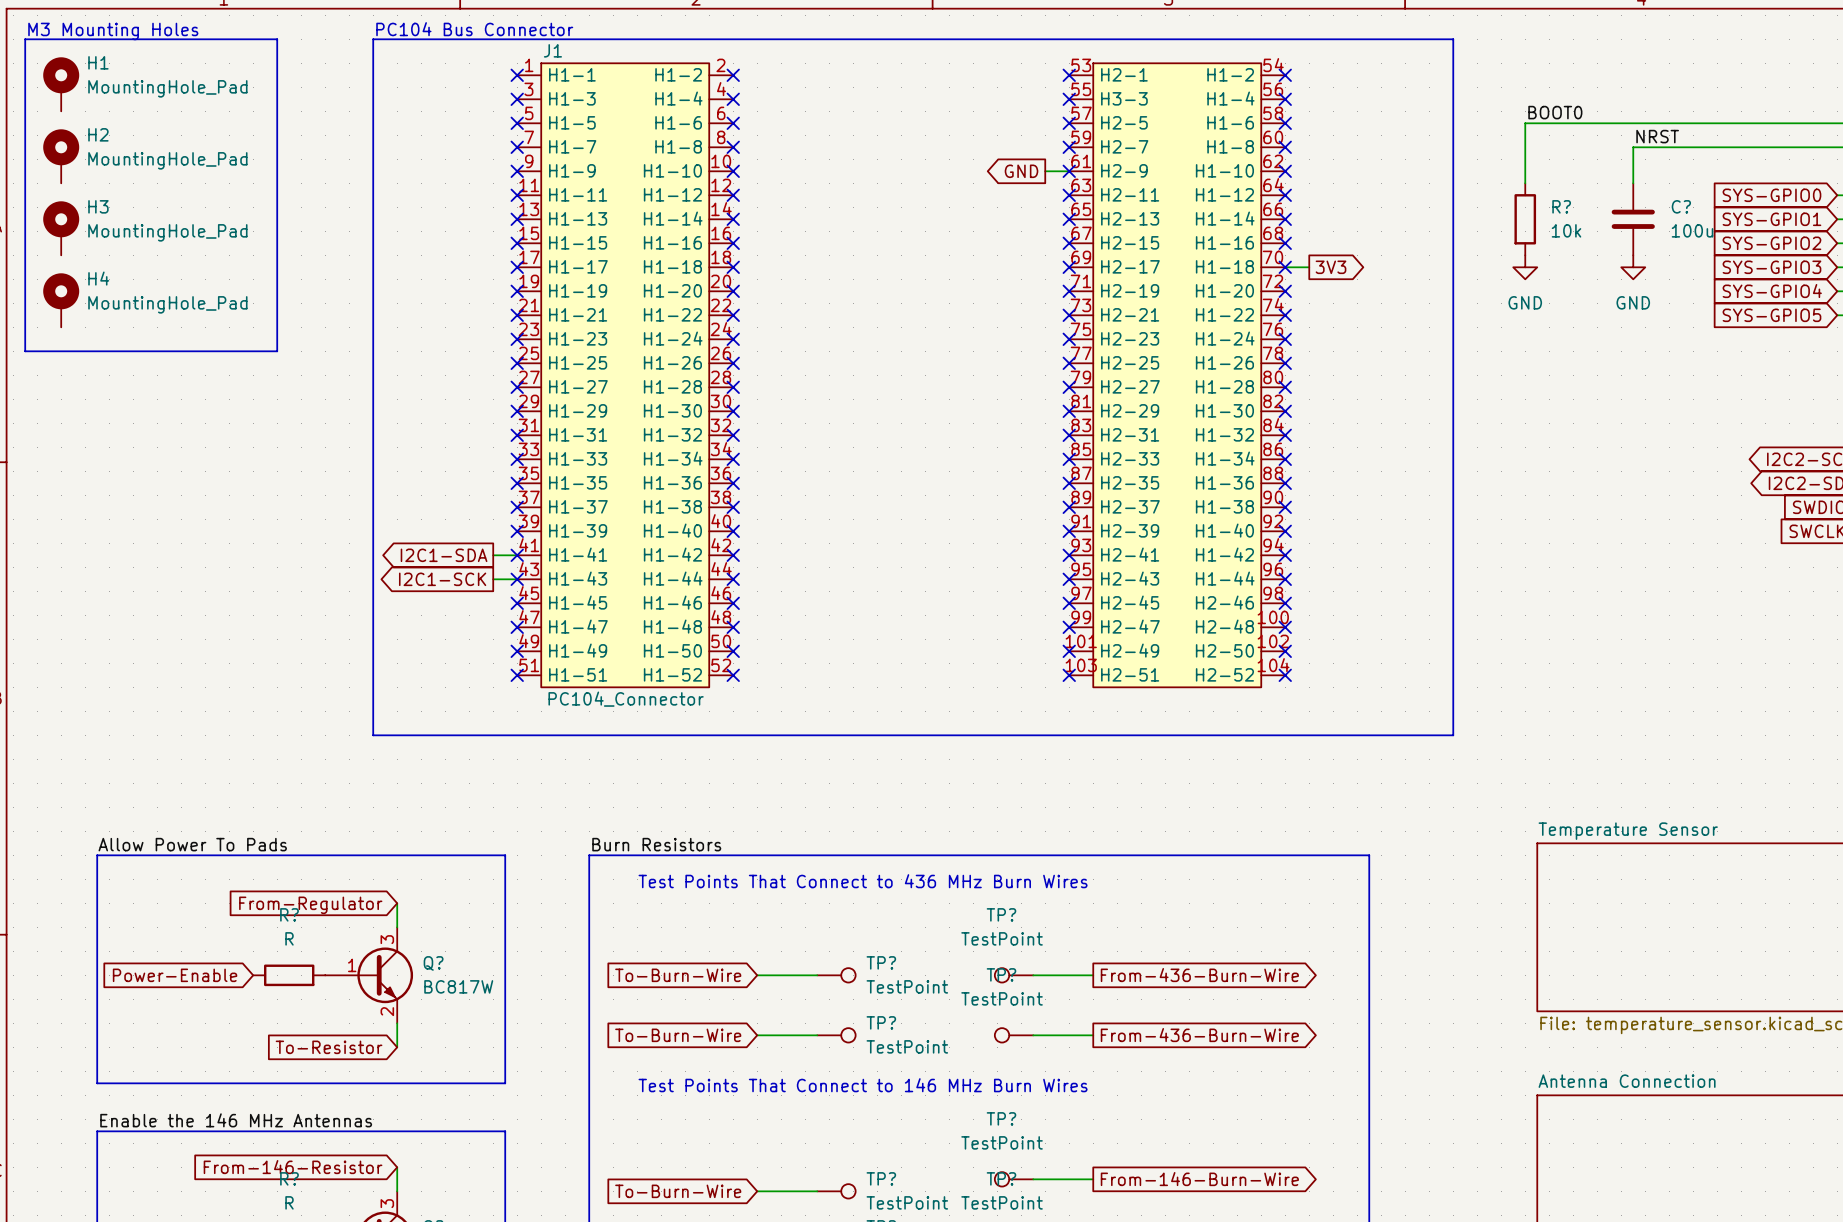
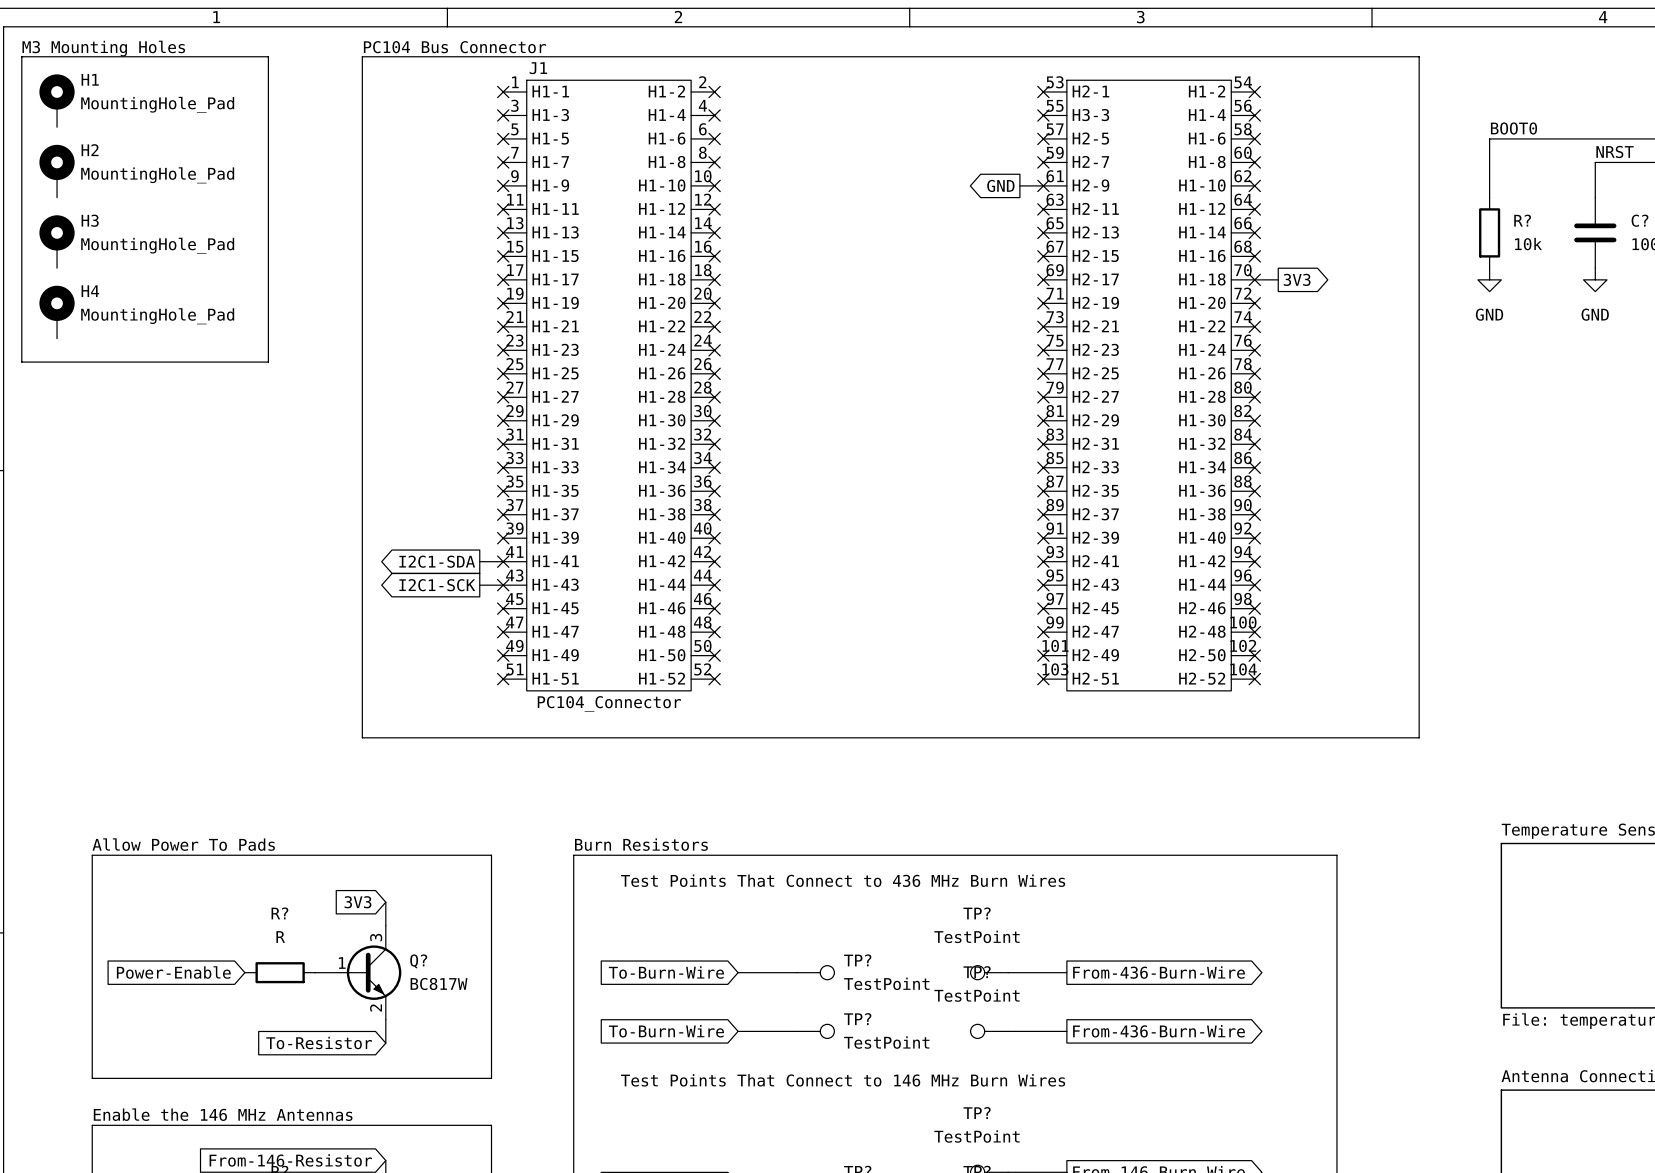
global label: From-Regulator (310, 905) -> 3V3 (358, 902)

